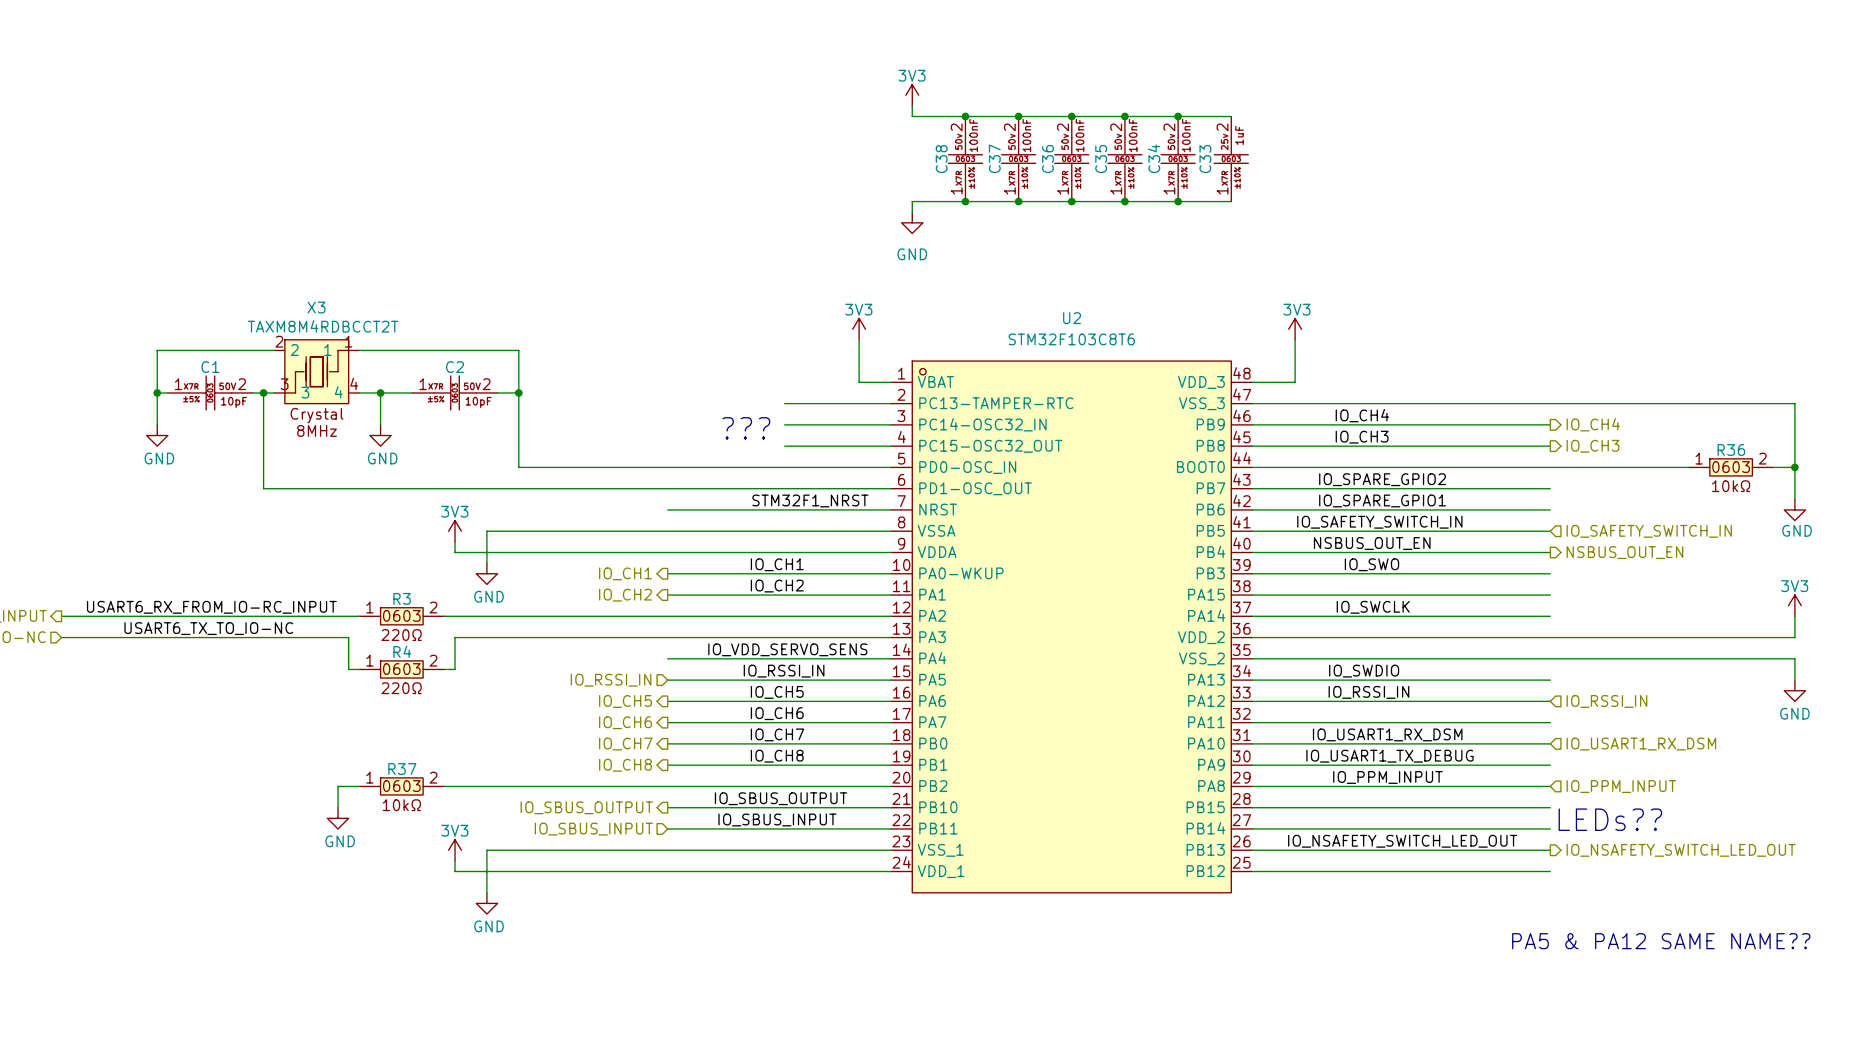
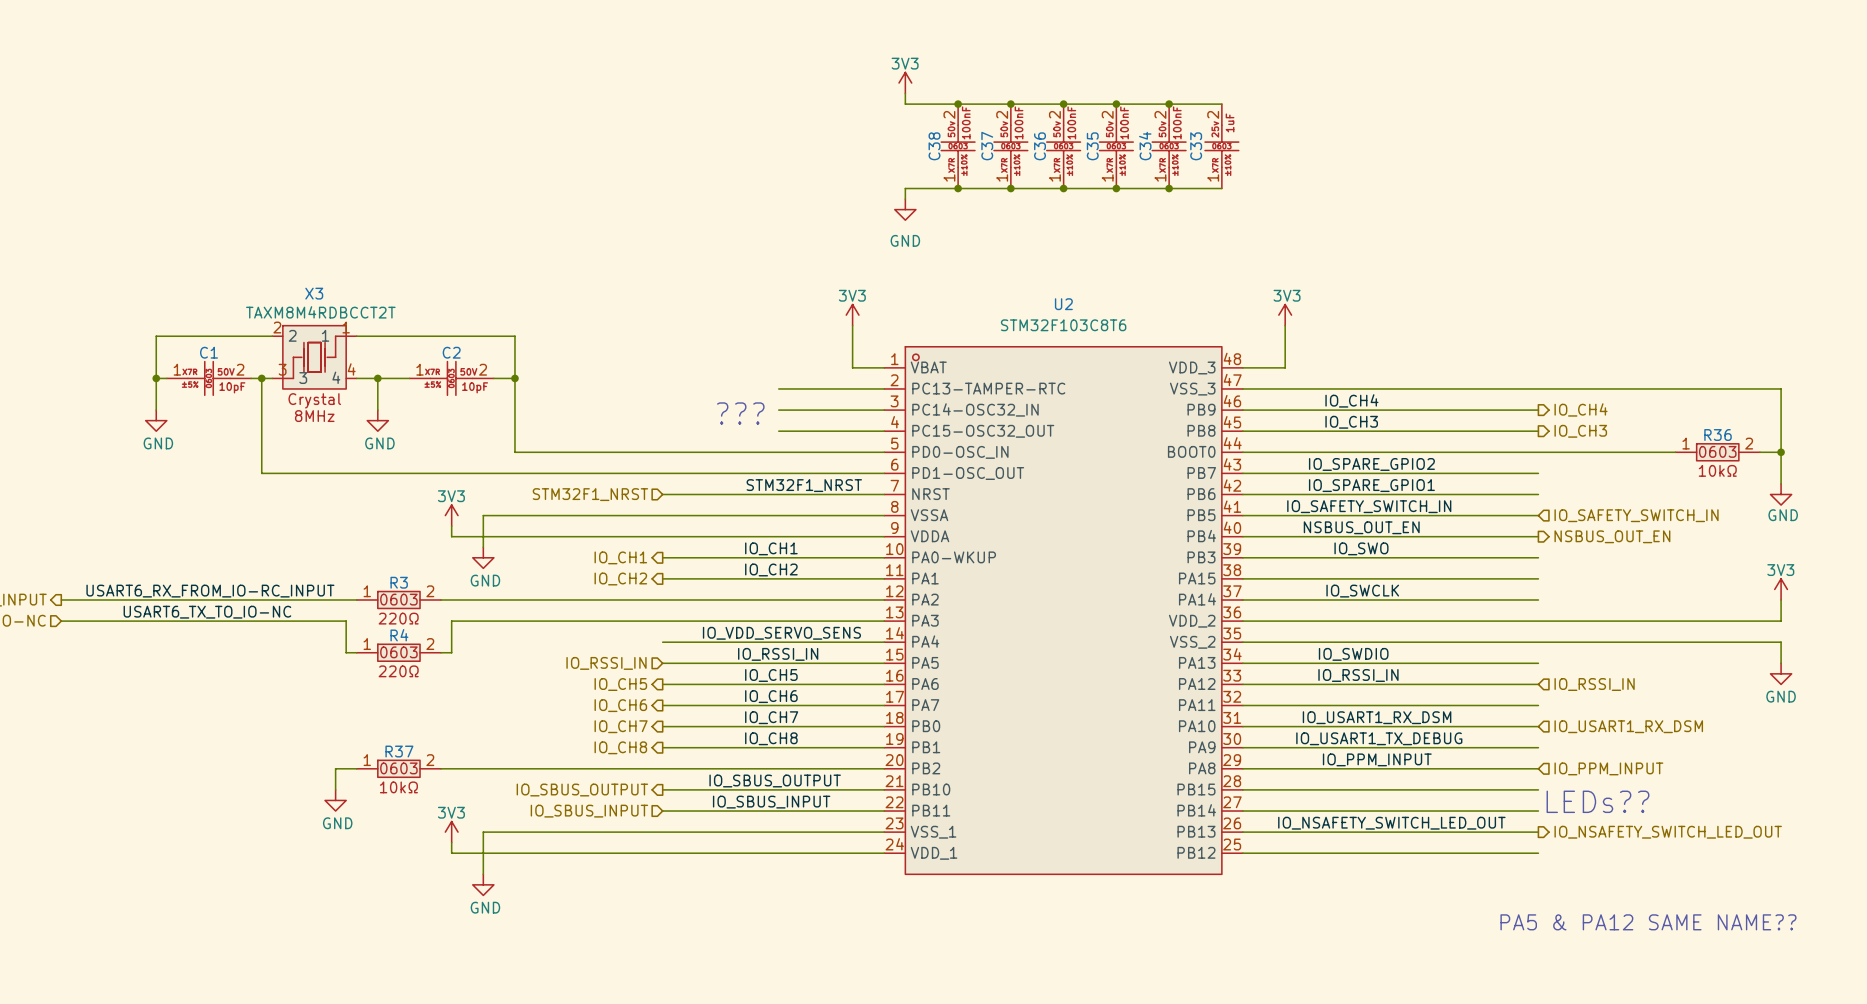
hierarchical label: none -> STM32F1_NRST (590, 494)

